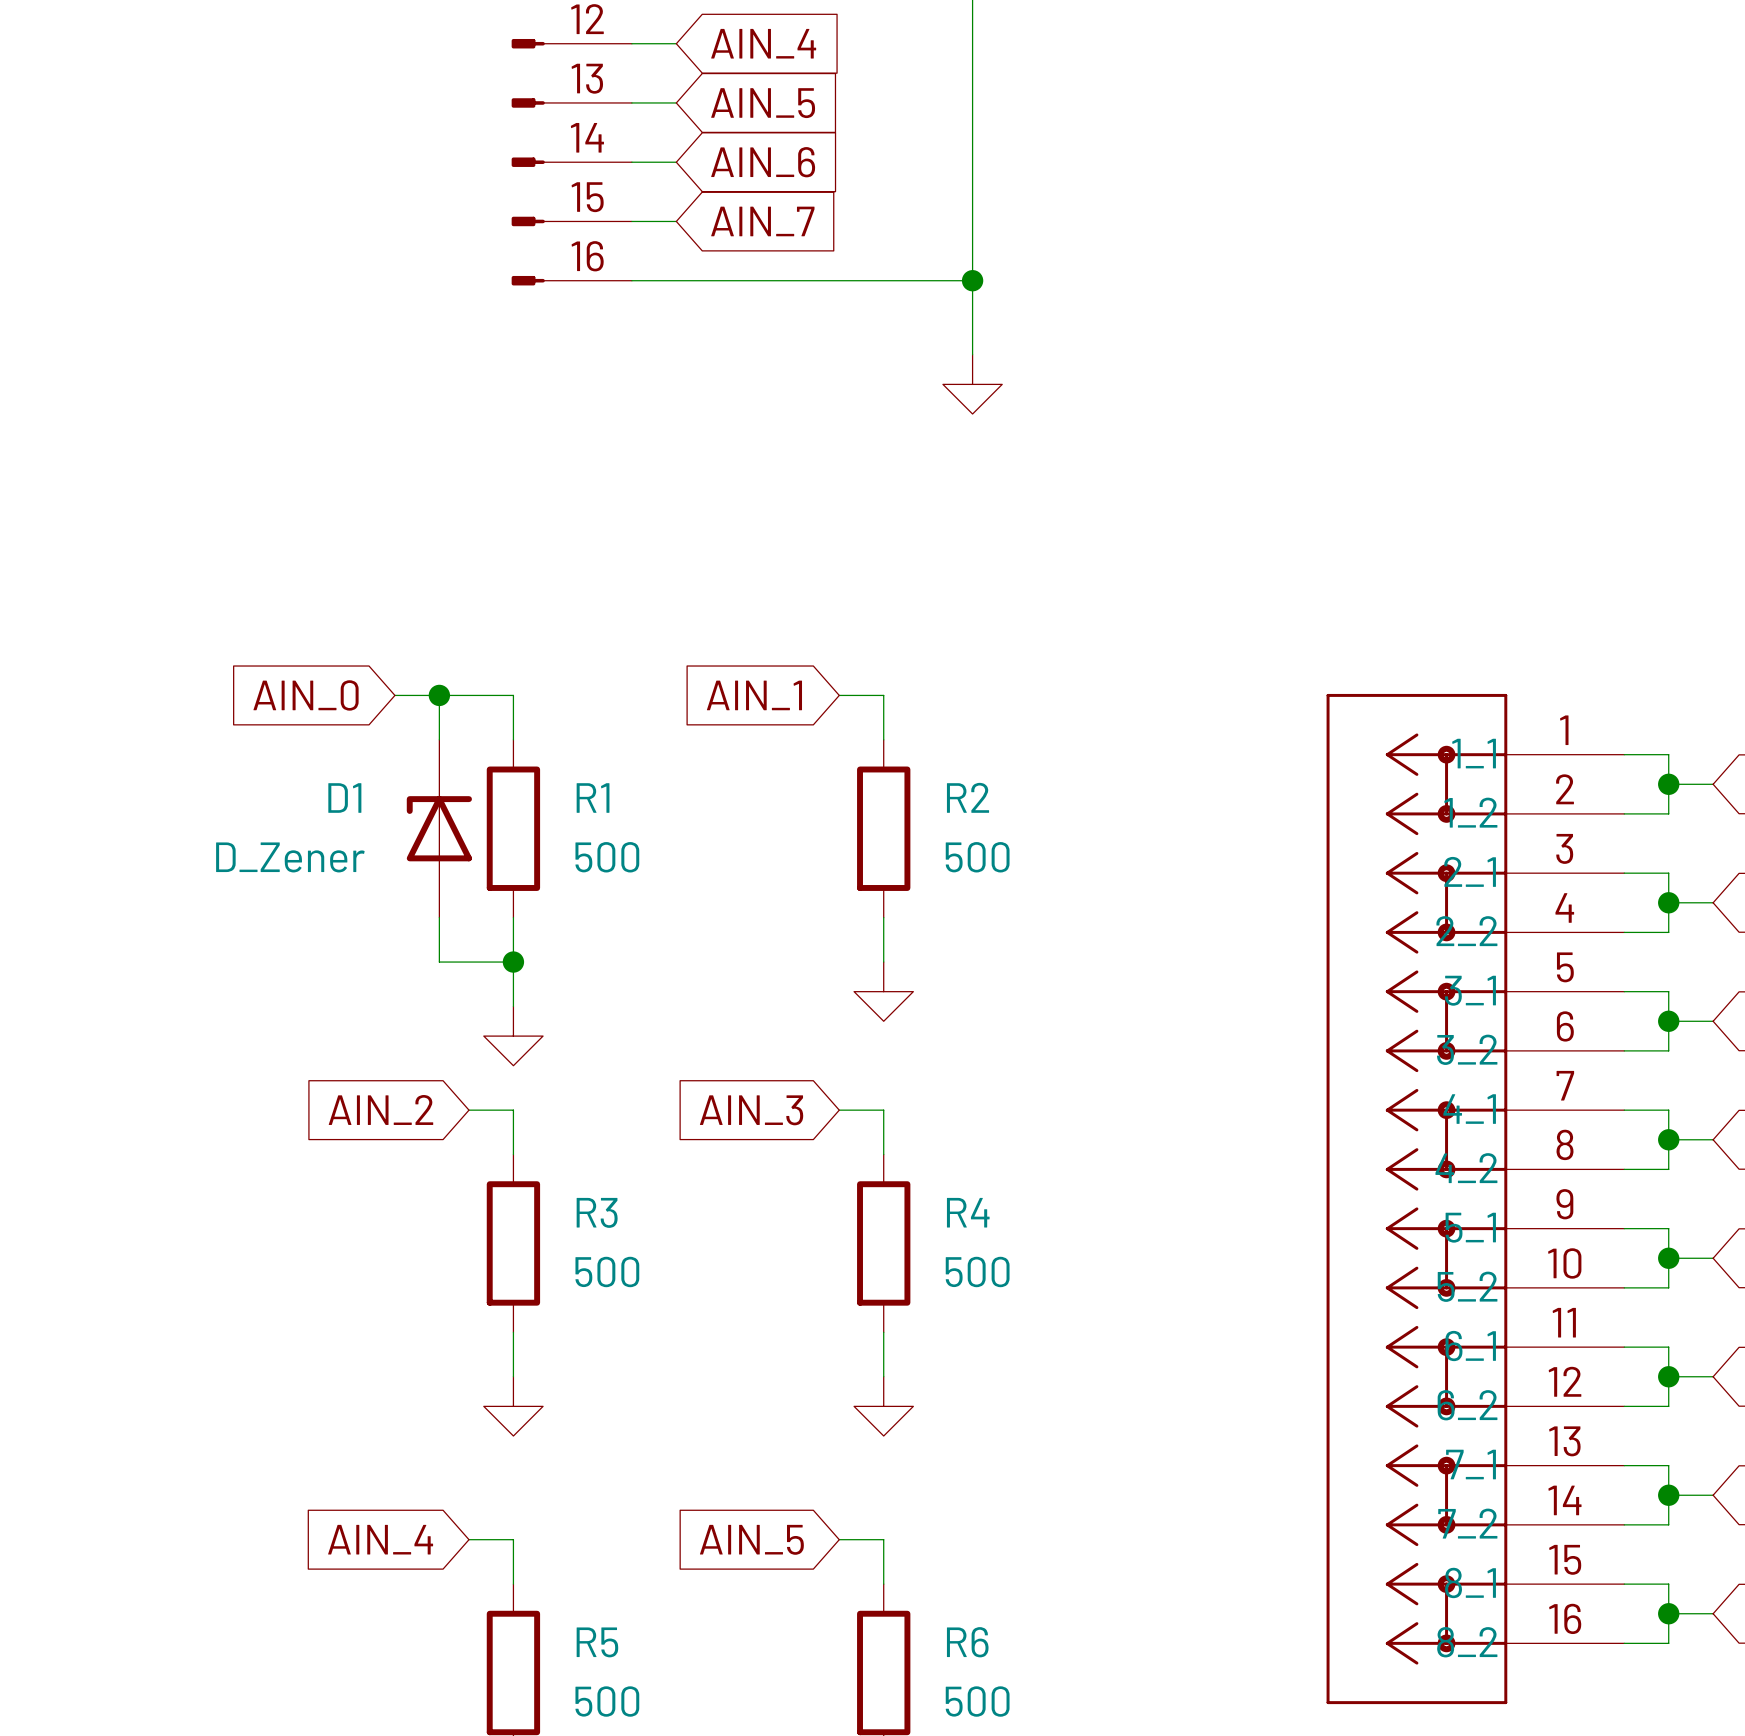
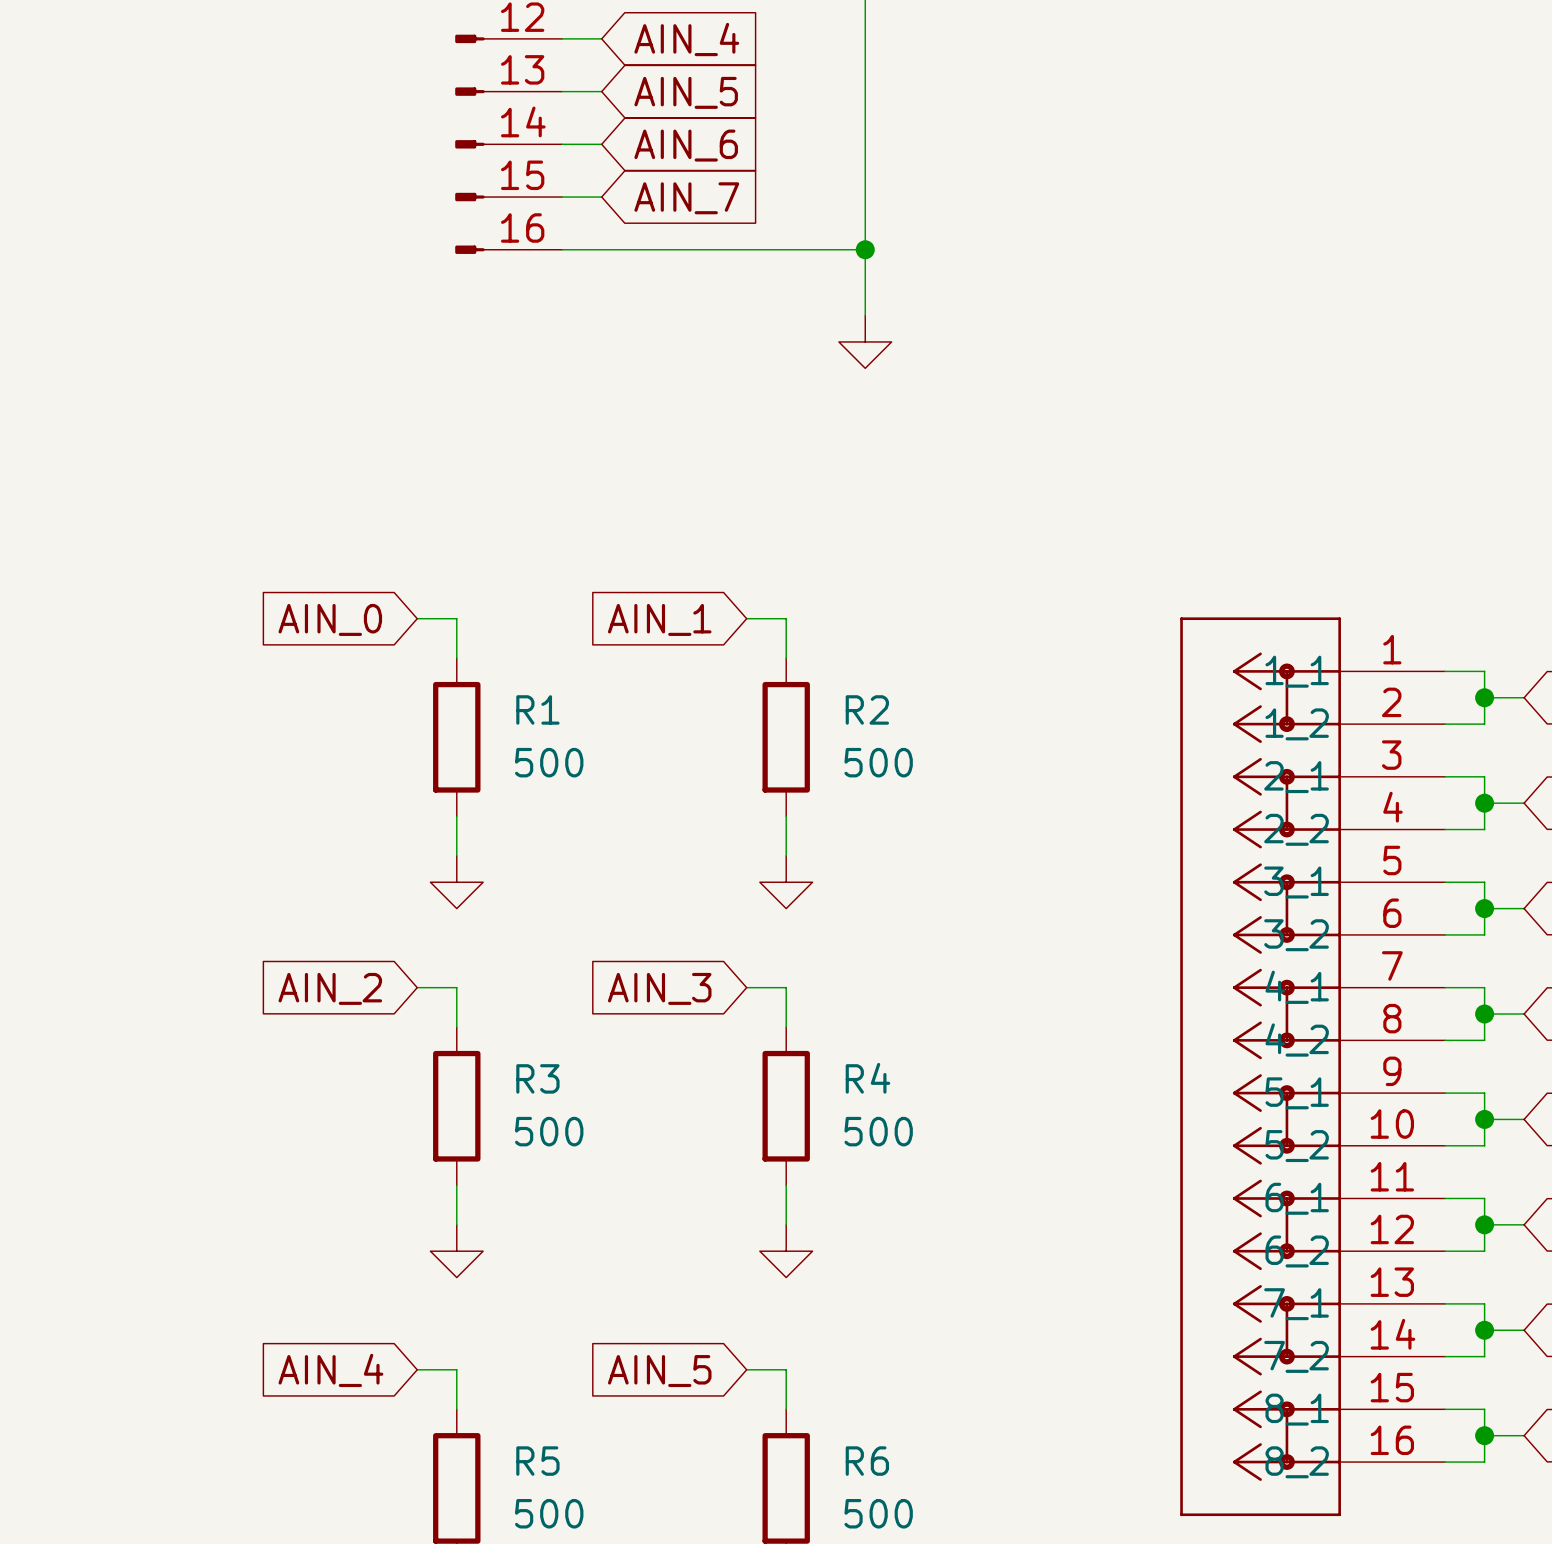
global label position: AIN_0 (305, 695) -> AIN_0 (330, 619)
wire: (394, 695) (468, 695) -> none
wire: (439, 695) (439, 739) -> none
junction: (439, 695) -> none
D1: D_Zener (439, 828) -> none
wire: (439, 917) (439, 962) (513, 962) (513, 1006) -> none
junction: (513, 962) -> none
power symbol position: (513, 1036) -> (456, 882)

